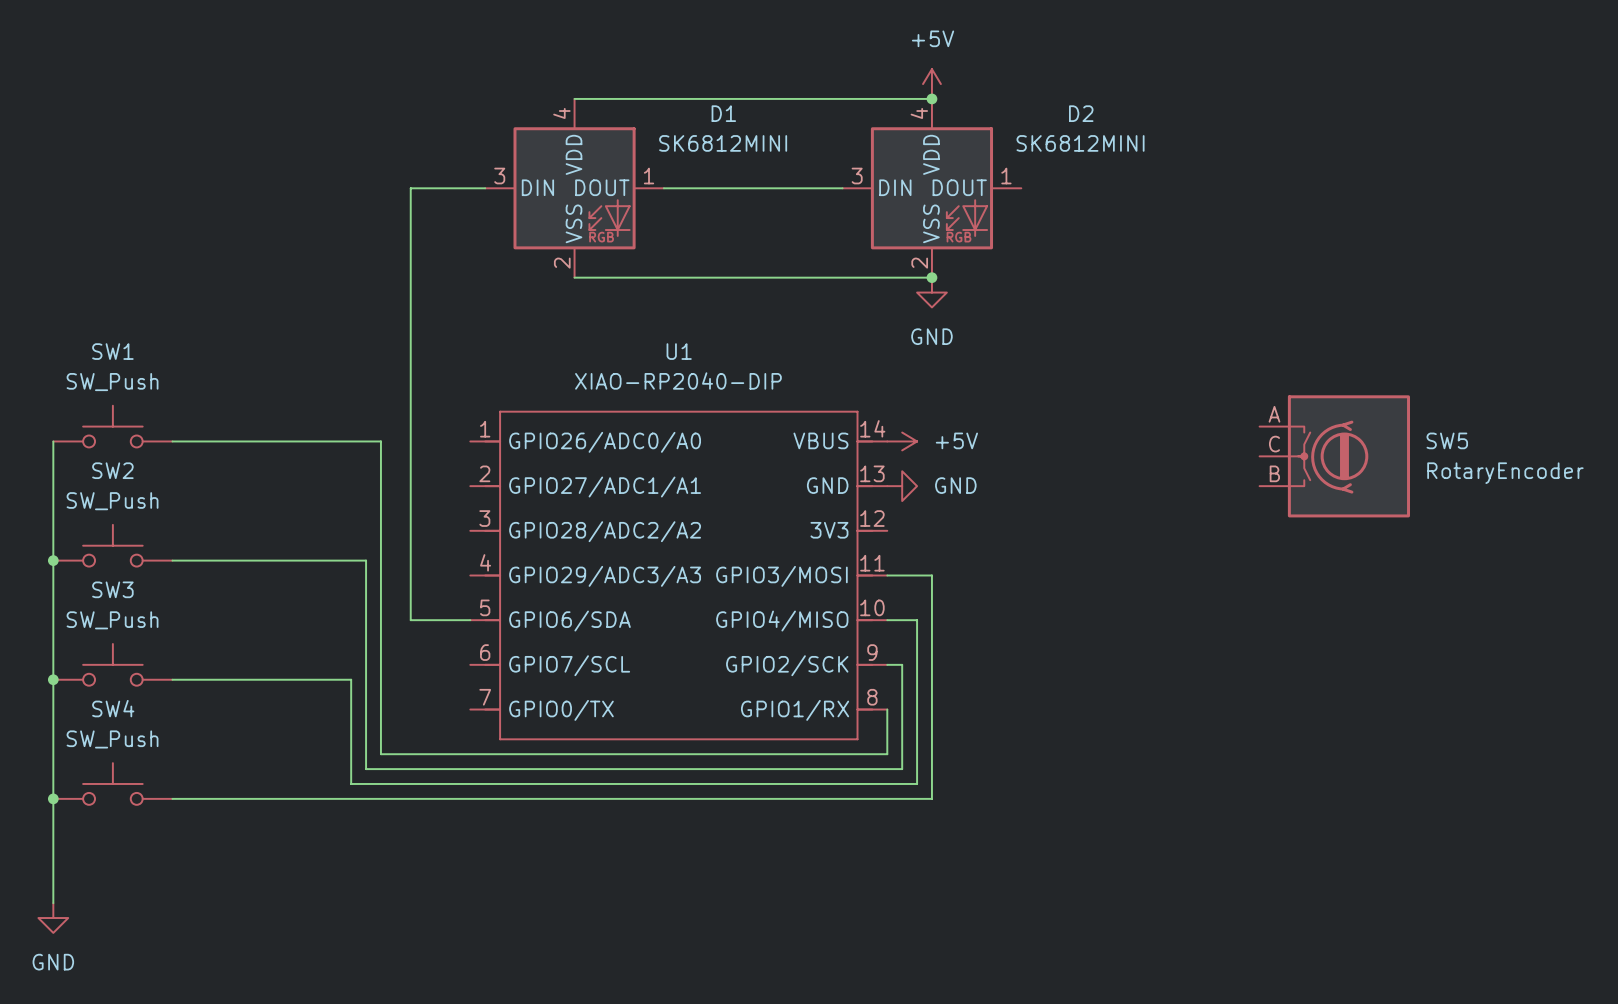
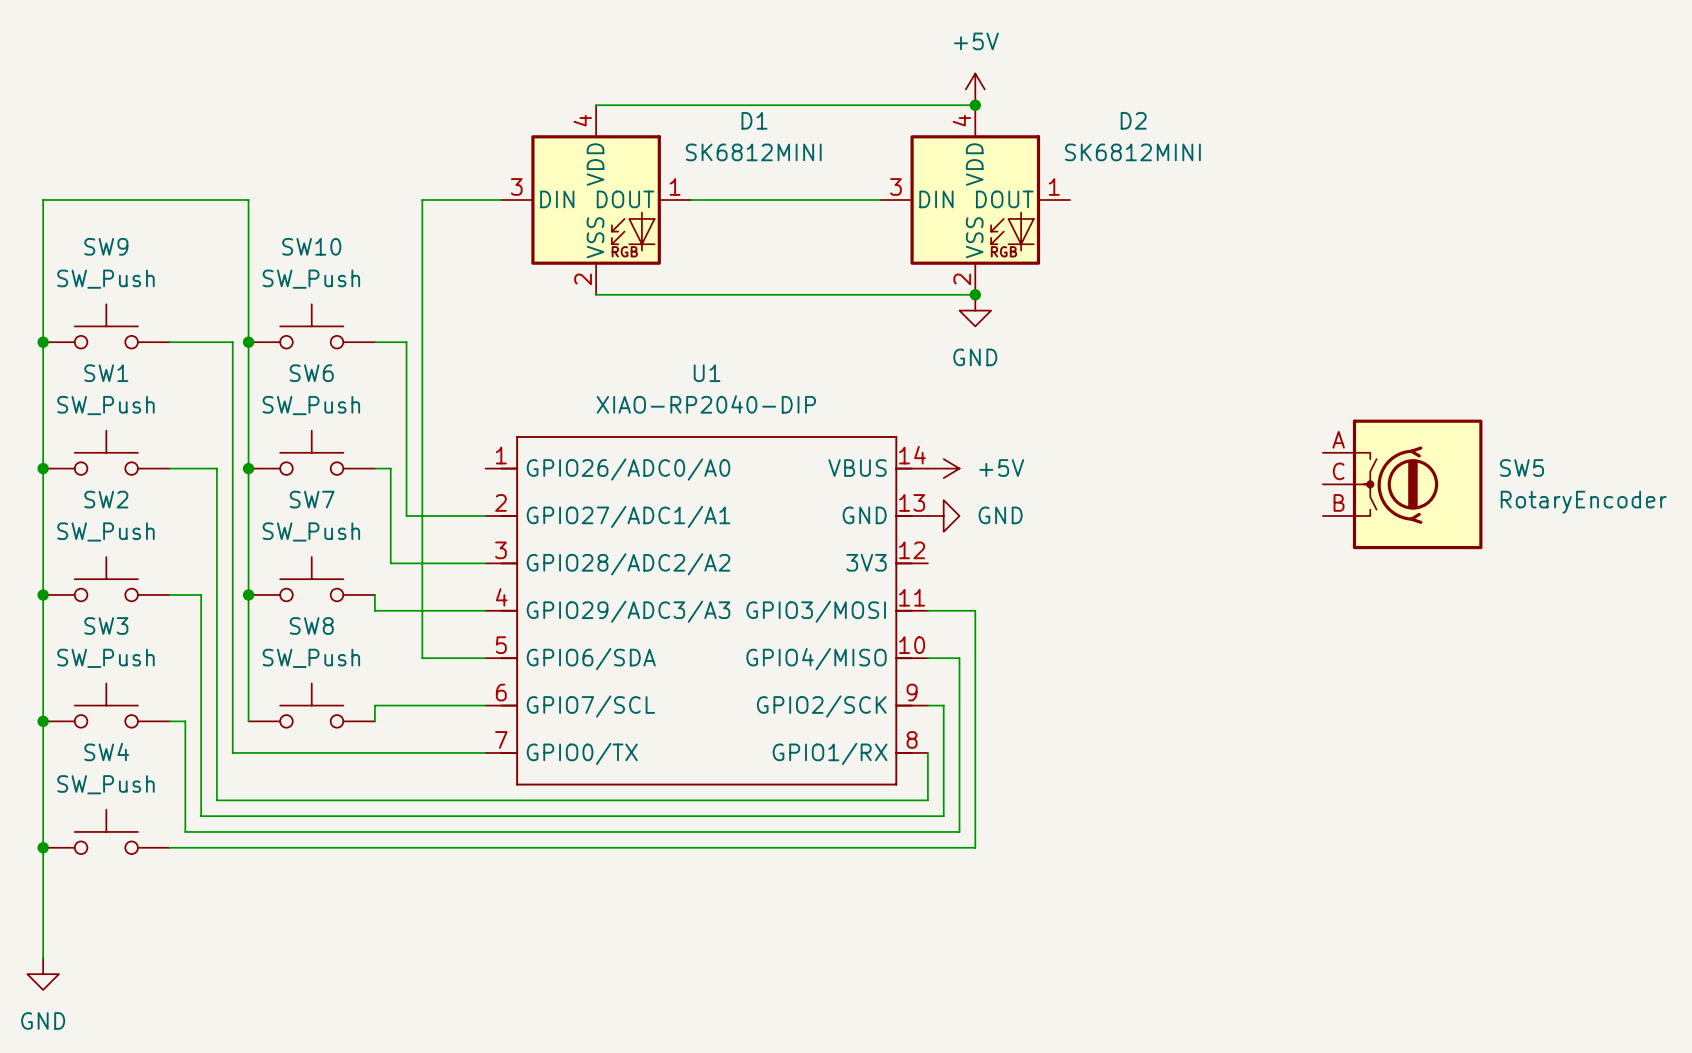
SW9: none -> SW_Push (106, 326)
SW10: none -> SW_Push (311, 326)
junction: none -> (43, 342)
wire: none -> (169, 342) (232, 342) (232, 752) (485, 752)
junction: none -> (248, 342)
wire: none -> (374, 342) (406, 342) (406, 515) (485, 515)
SW6: none -> SW_Push (311, 452)
wire: none -> (43, 468) (43, 200) (248, 200) (248, 721)
junction: none -> (43, 468)
wire: (217, 441) (366, 441) -> none
junction: none -> (248, 468)
wire: (380, 530) (380, 754) -> (216, 468) (216, 800) (390, 800)
wire: none -> (390, 563) (485, 563)
SW7: none -> SW_Push (311, 579)
wire: (202, 560) (366, 560) -> none
junction: none -> (248, 594)
wire: (366, 575) (366, 664) -> (374, 610) (485, 610)
SW8: none -> SW_Push (311, 705)
wire: none -> (374, 705) (485, 705)
wire: (187, 679) (351, 679) (351, 783) -> (185, 721) (185, 831) (359, 831)
wire: (366, 679) (366, 769) -> (201, 594) (201, 816) (374, 816)

